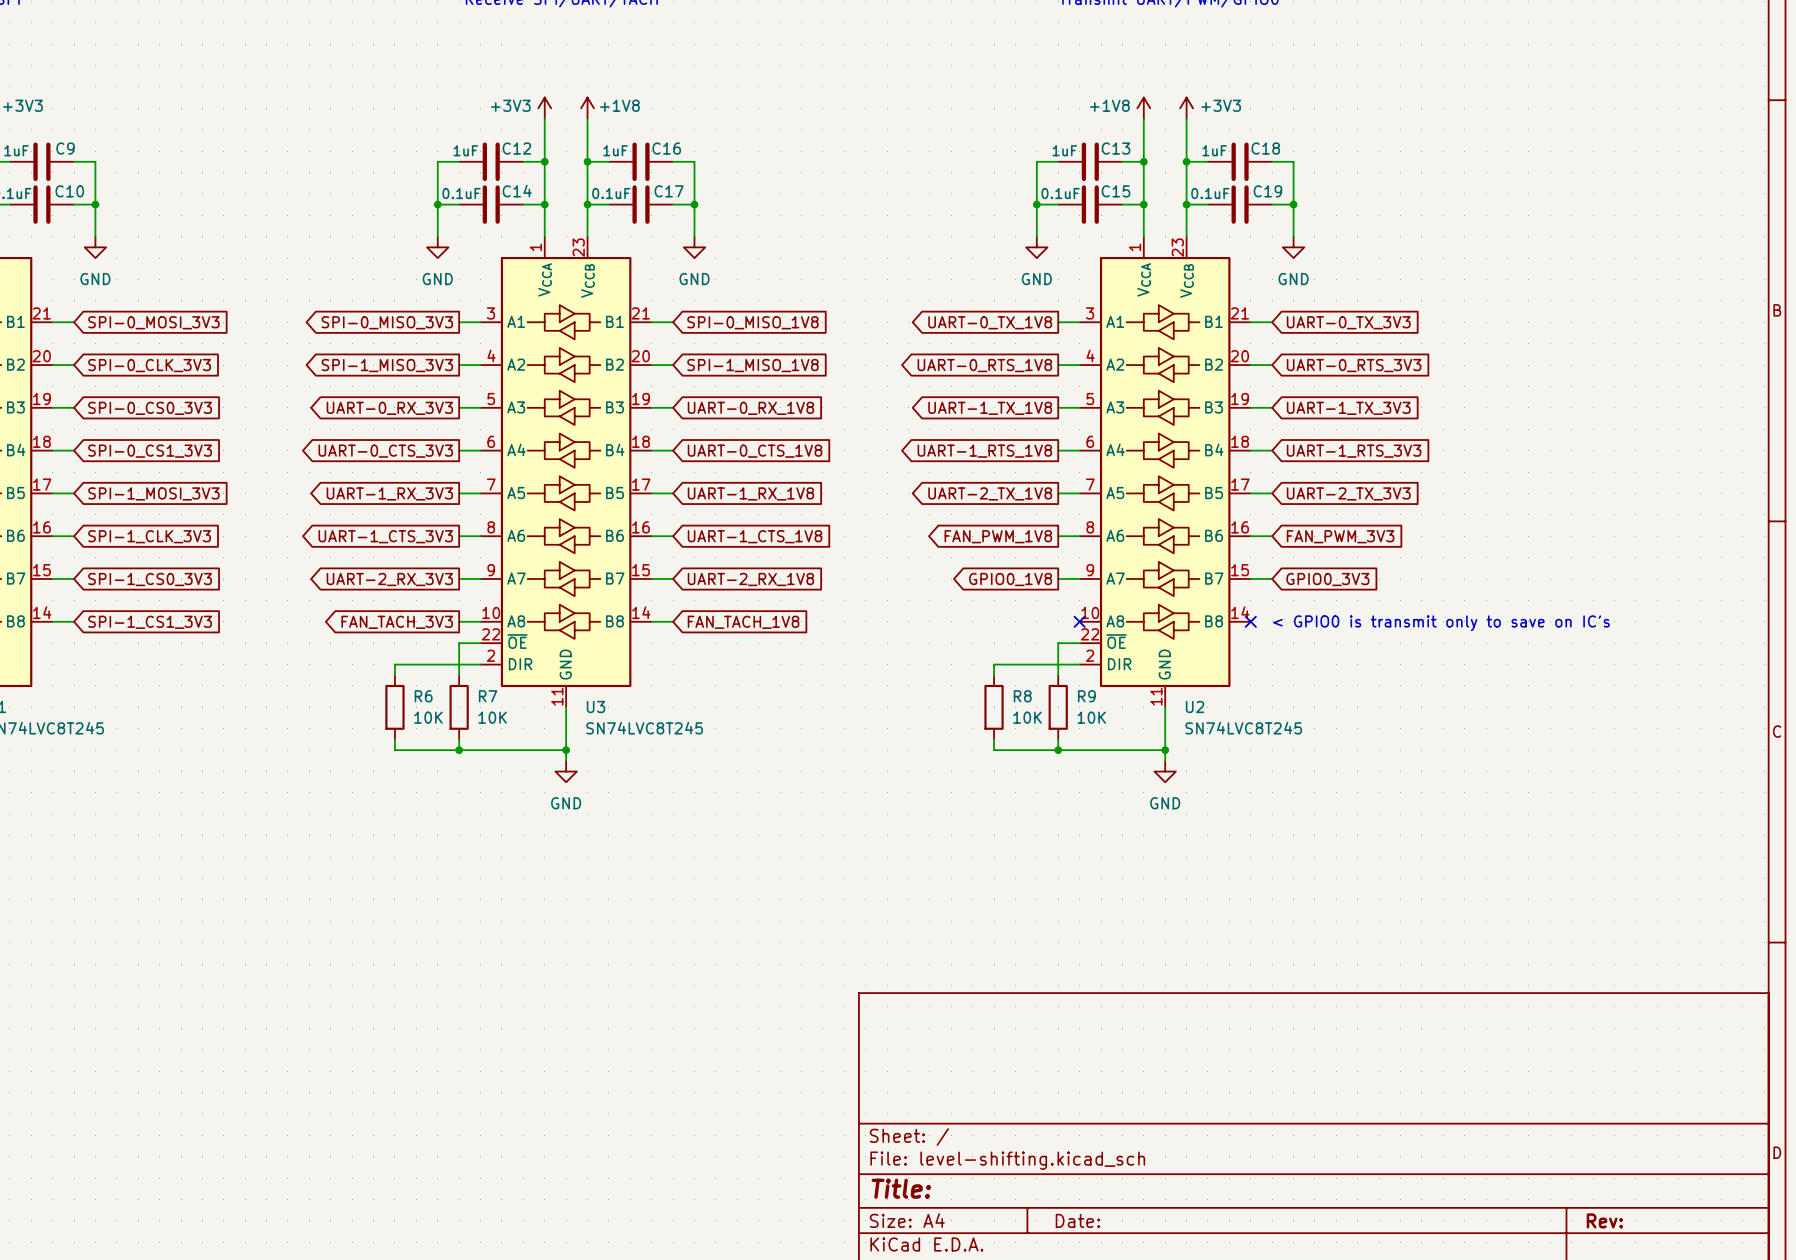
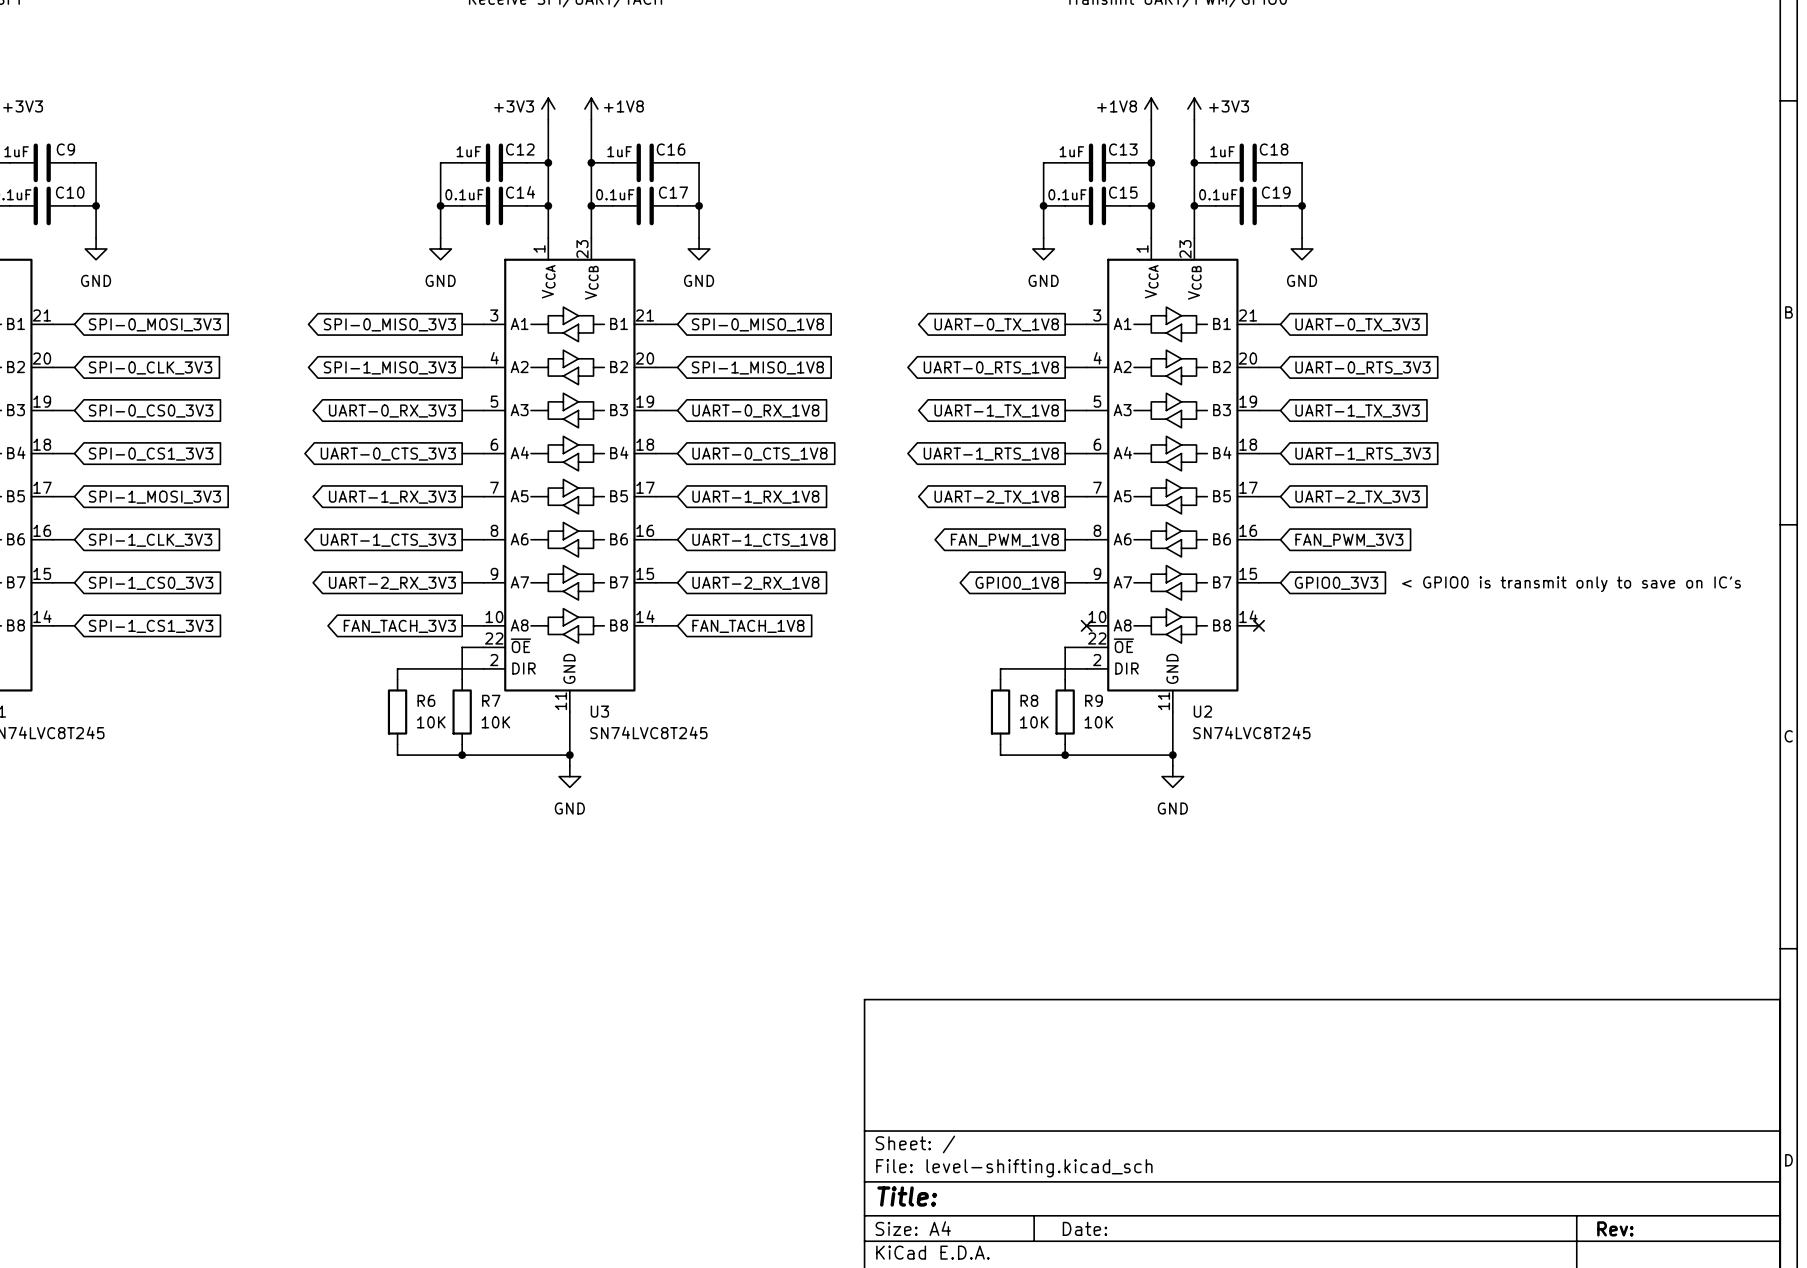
text position: < GPIO0 is transmit only to save on IC's (1441, 623) -> < GPIO0 is transmit only to save on IC's (1571, 584)

